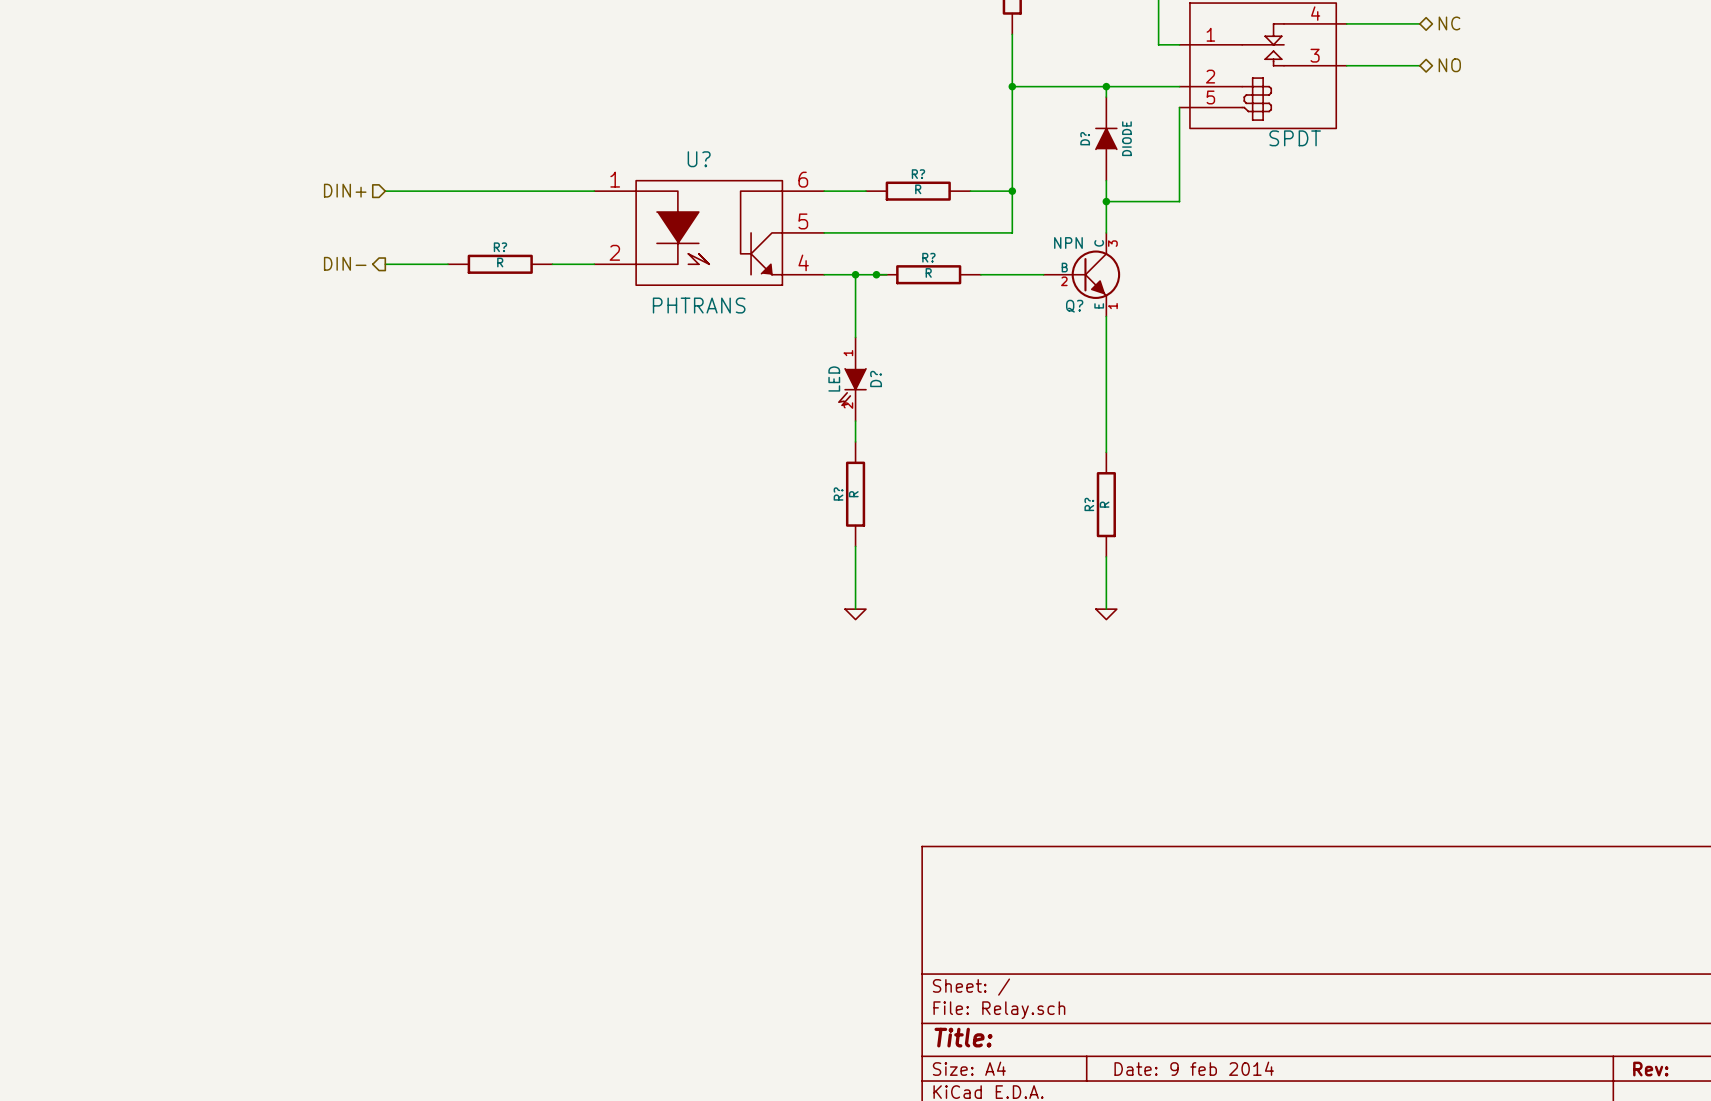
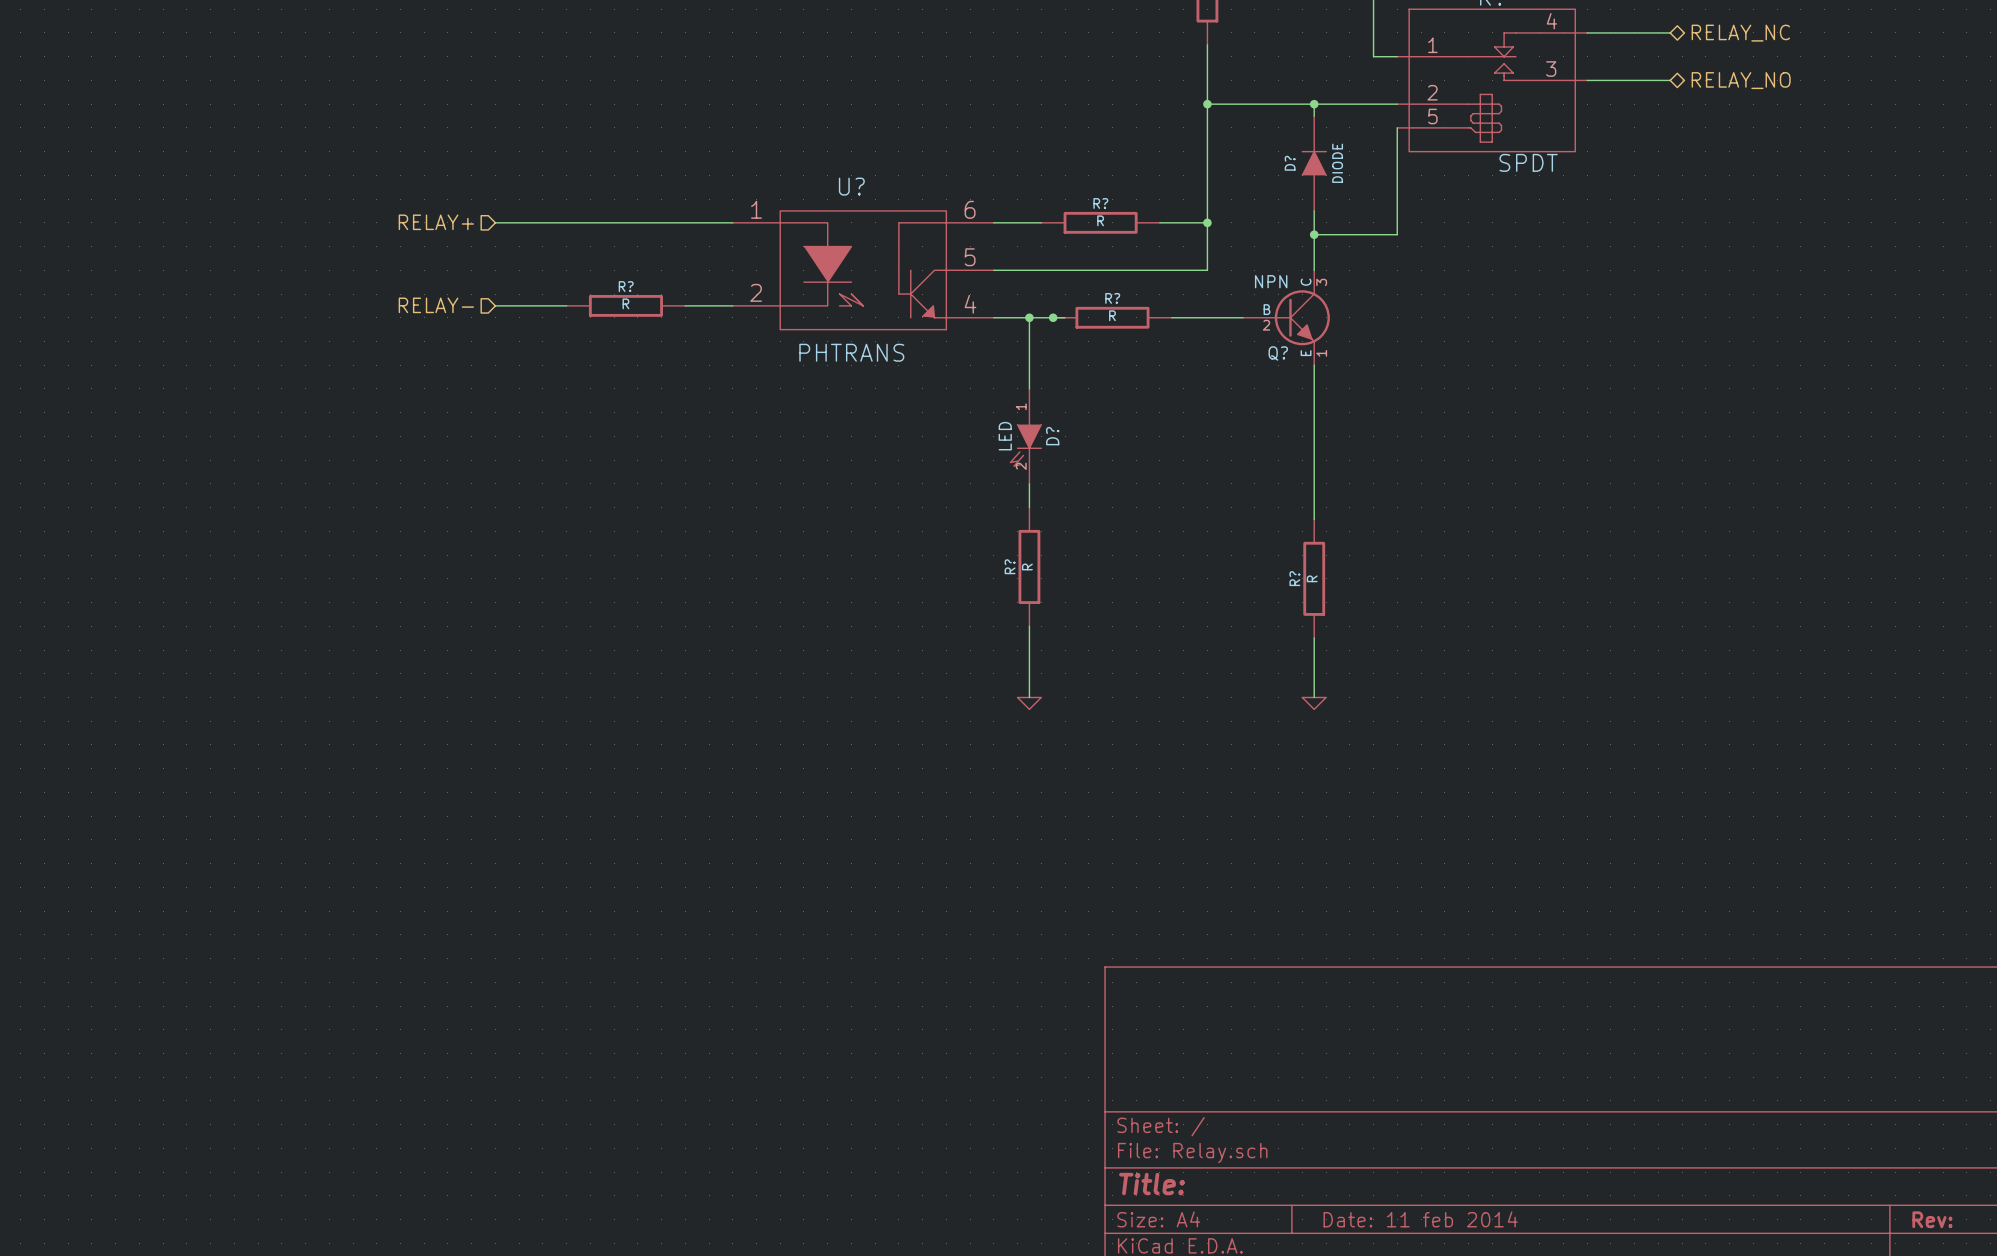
hierarchical label: NC (1449, 23) -> RELAY_NC (1740, 33)
hierarchical label: NO (1449, 65) -> RELAY_NO (1741, 80)
hierarchical label: DIN+ (345, 190) -> RELAY+ (436, 222)
hierarchical label shape: output (345, 263) -> input (436, 305)
hierarchical label: DIN- (345, 263) -> RELAY- (436, 305)
title block: Date: 9 feb 2014 (1194, 1068) -> Date: 11 feb 2014 (1420, 1219)

